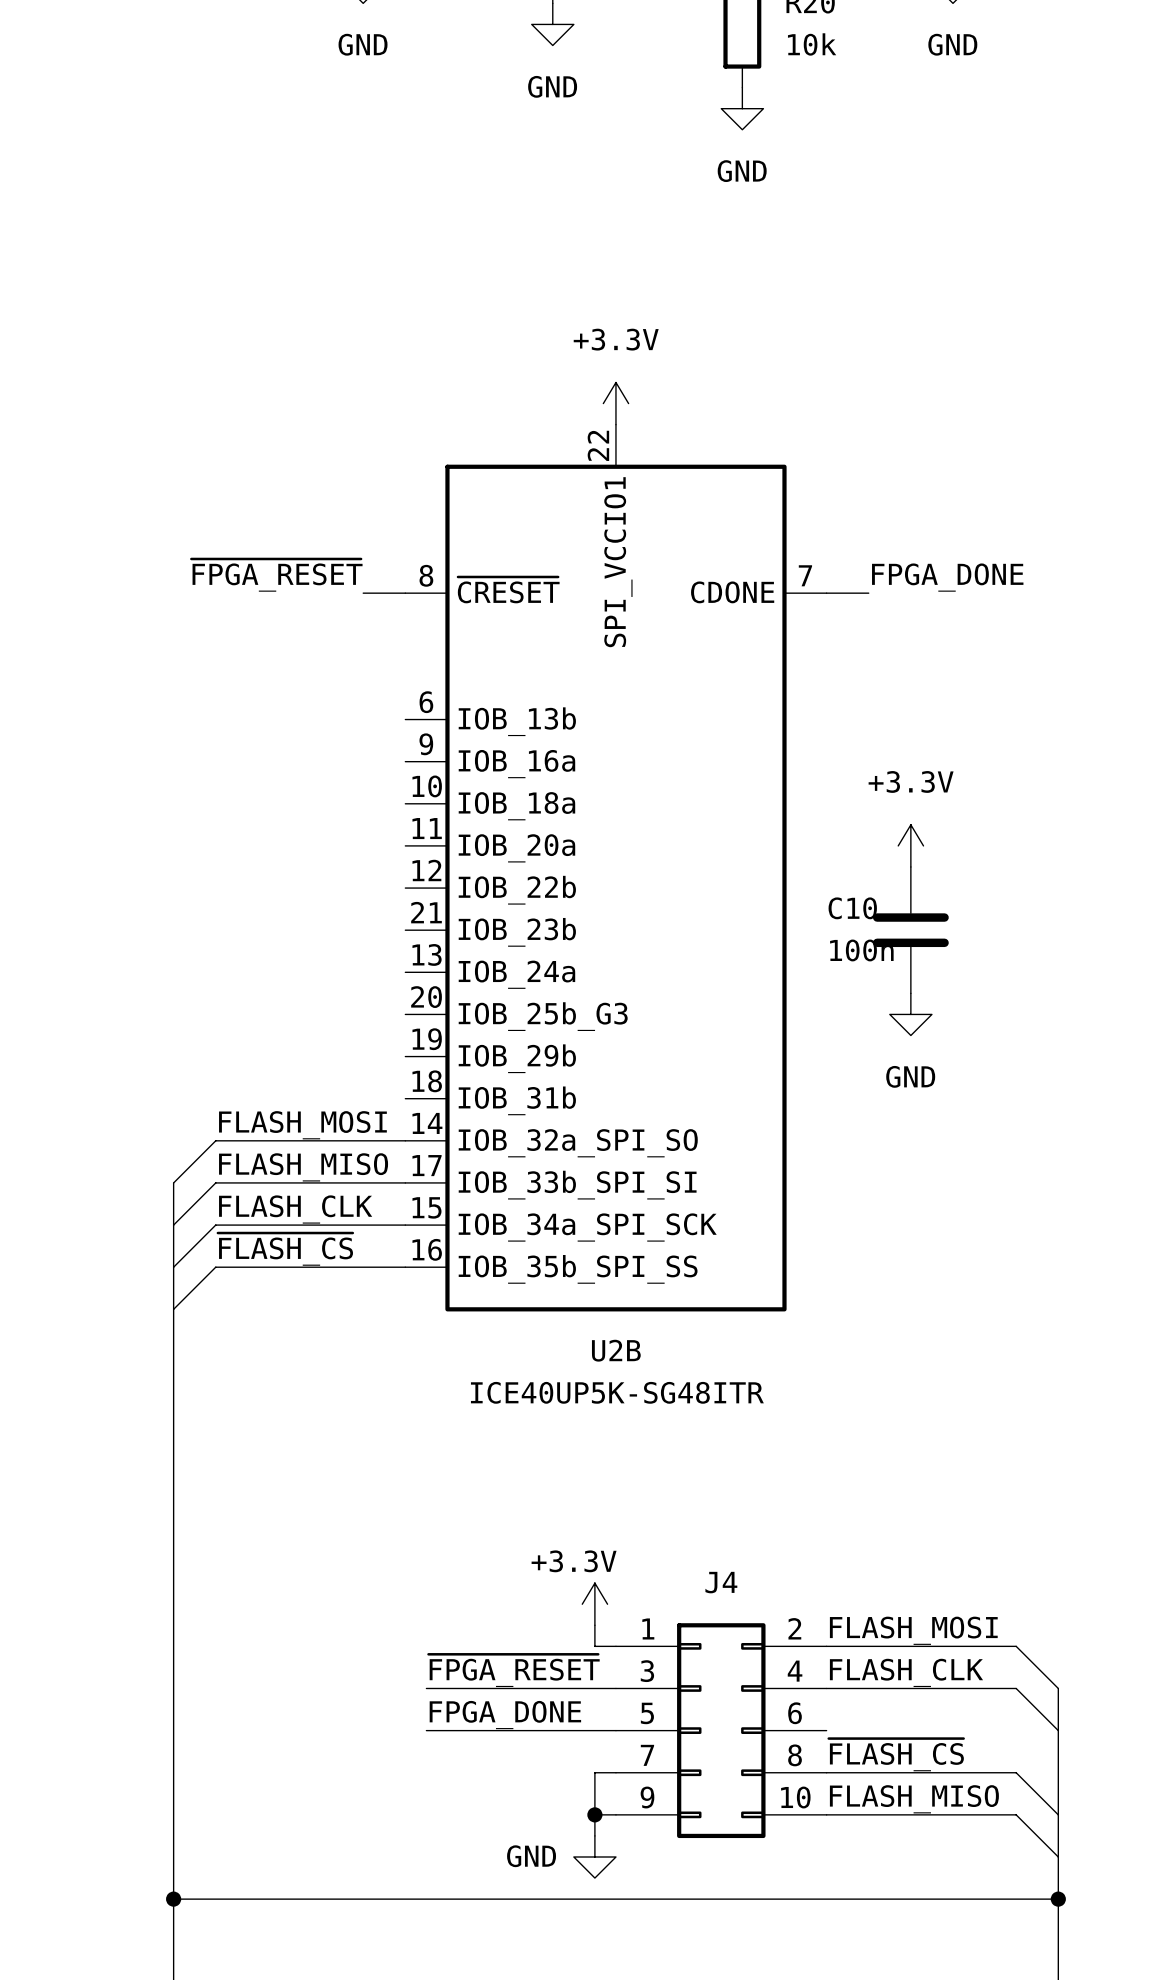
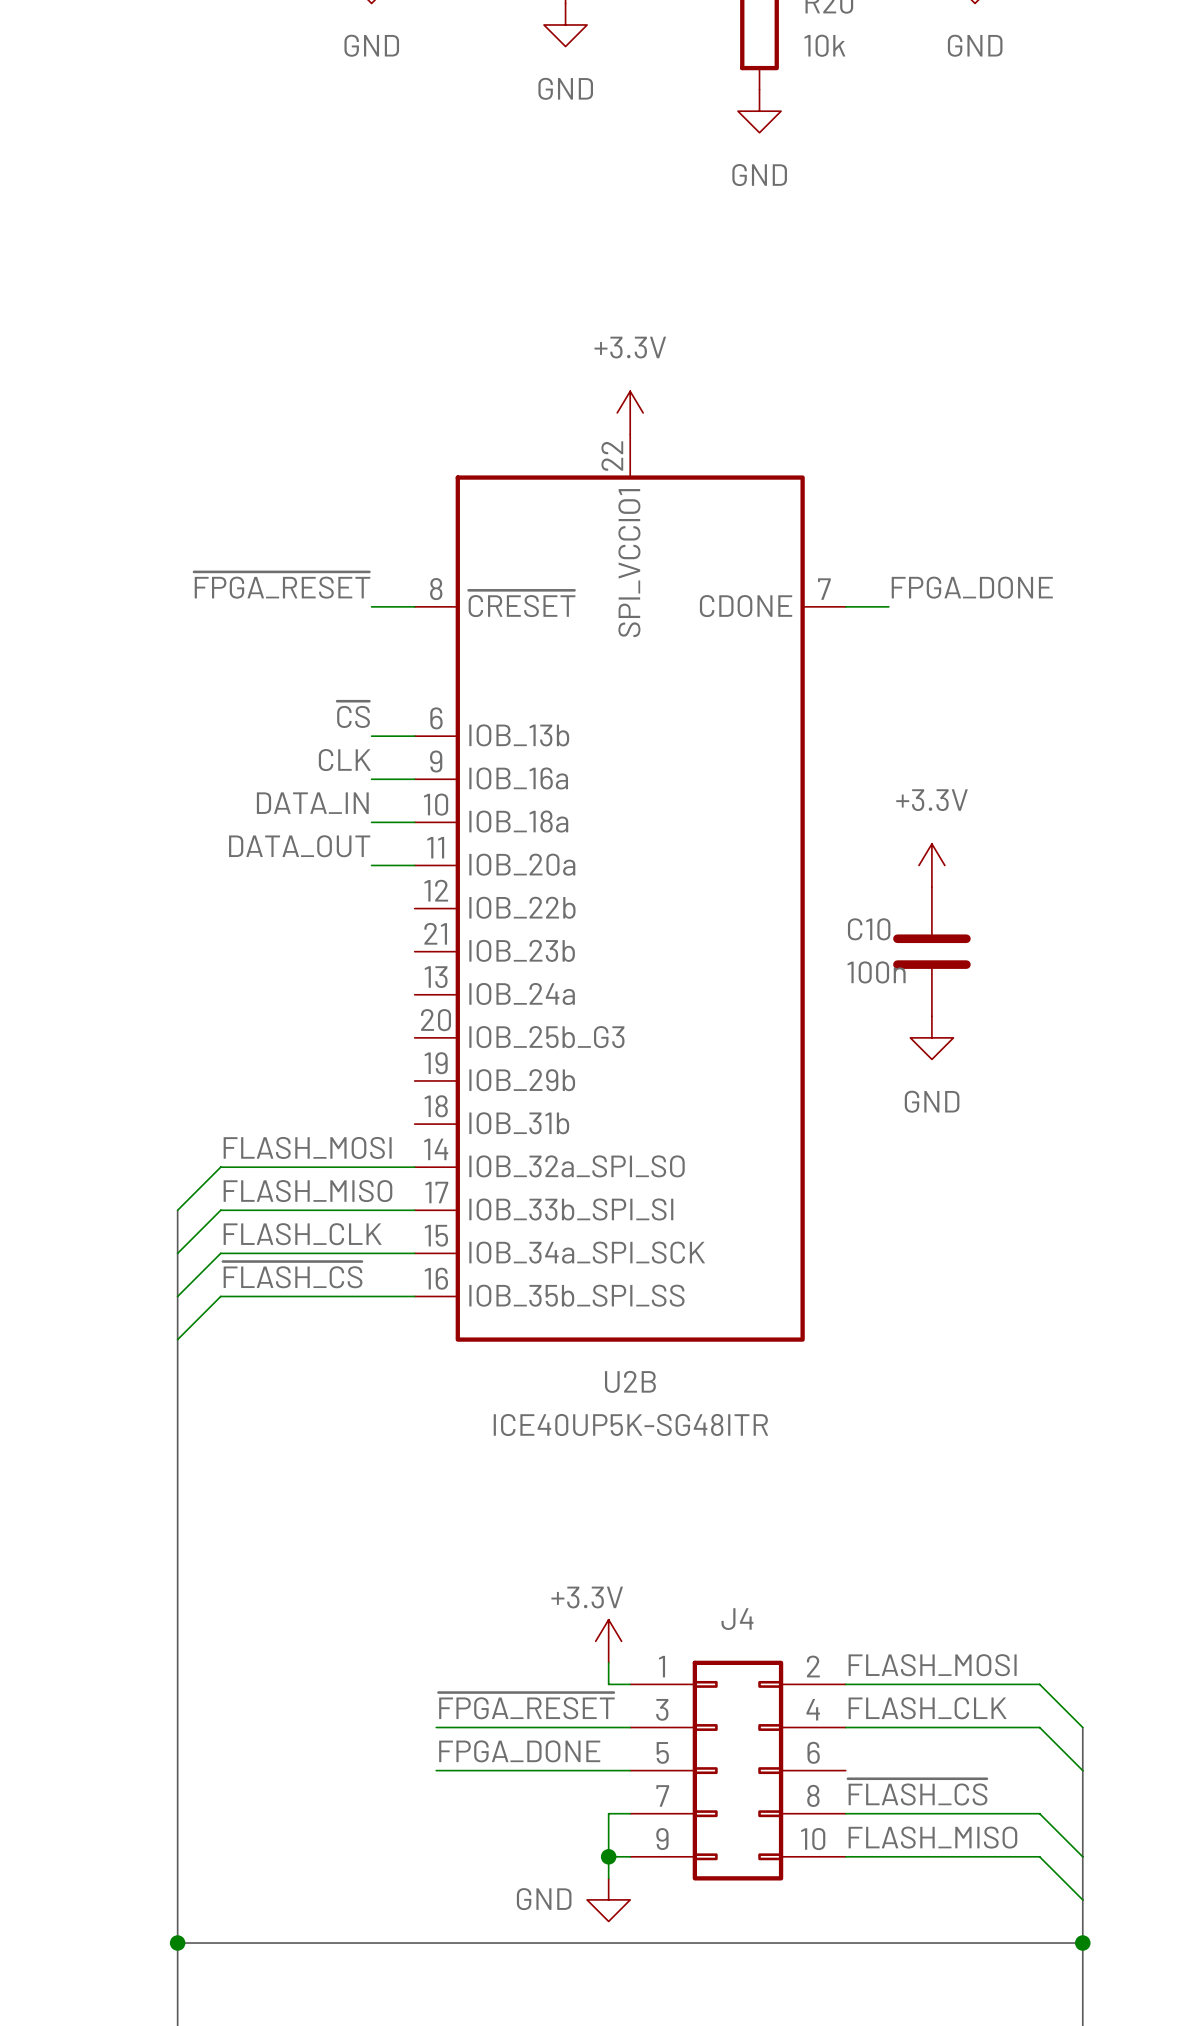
label: none -> ~{CS} (353, 714)
wire: none -> (371, 736) (414, 736)
label: none -> CLK (344, 760)
wire: none -> (371, 779) (414, 779)
label: none -> DATA_IN (312, 803)
wire: none -> (371, 822) (414, 822)
label: none -> DATA_OUT (299, 846)
wire: none -> (371, 865) (414, 865)

